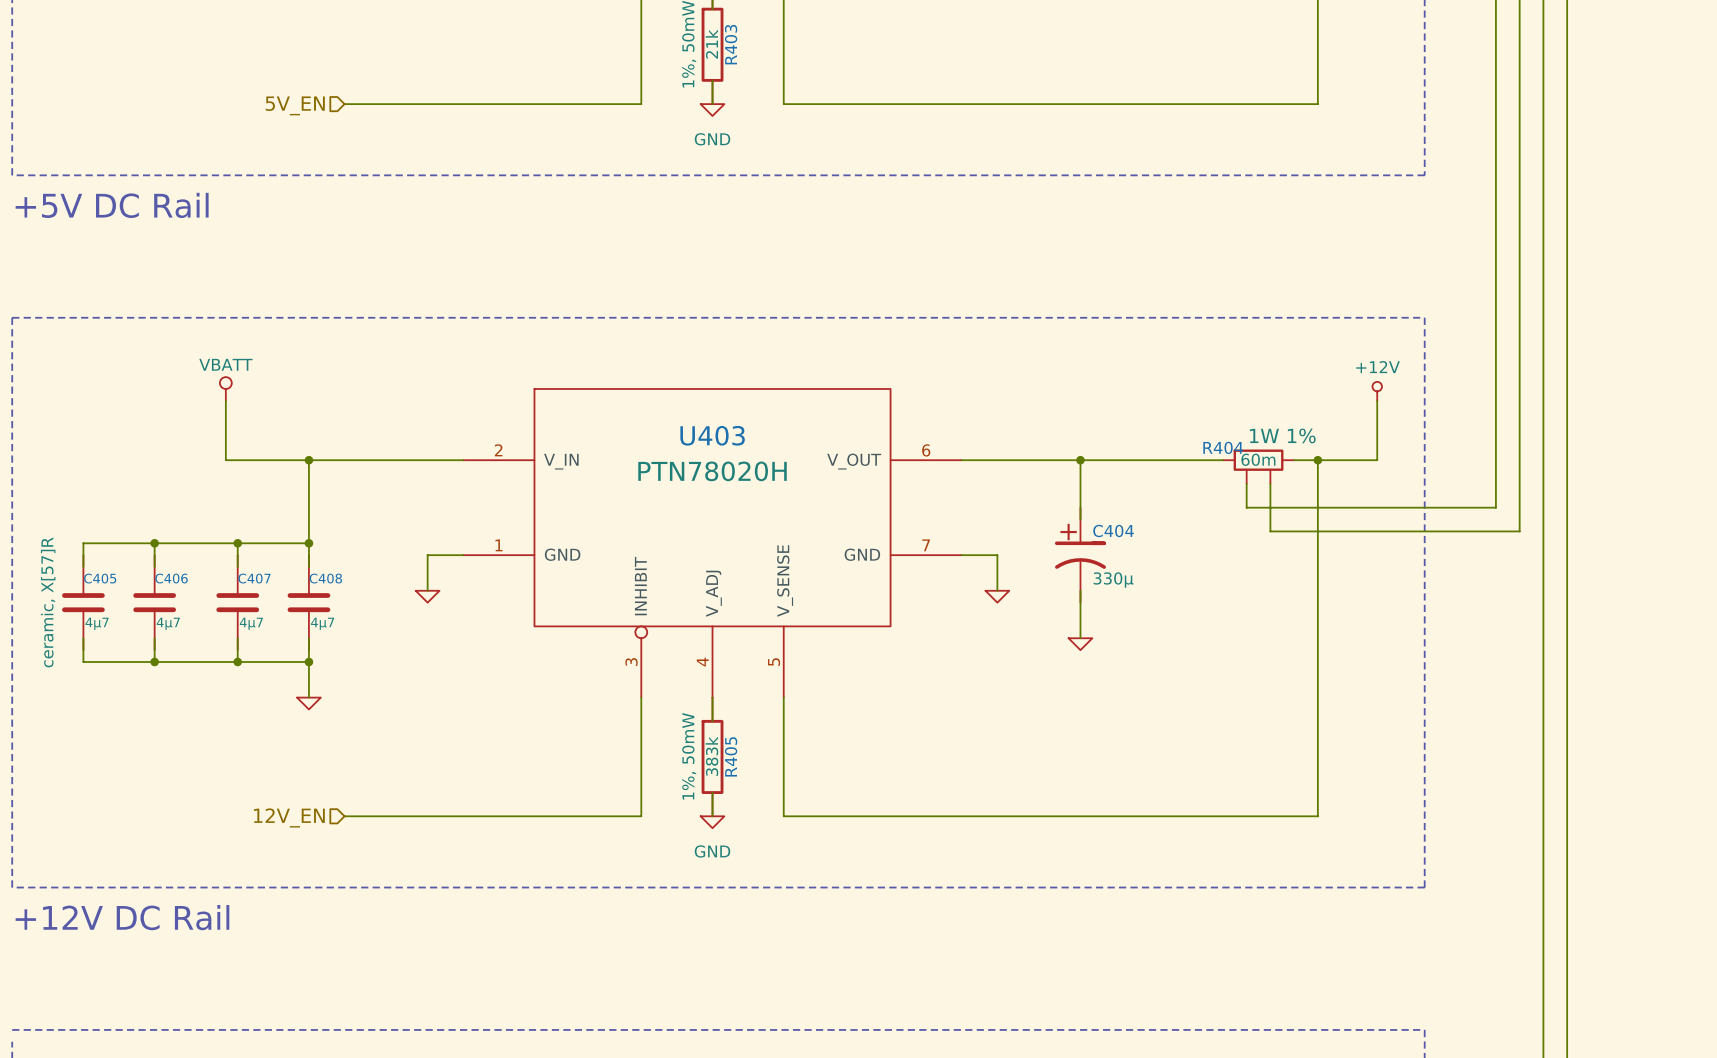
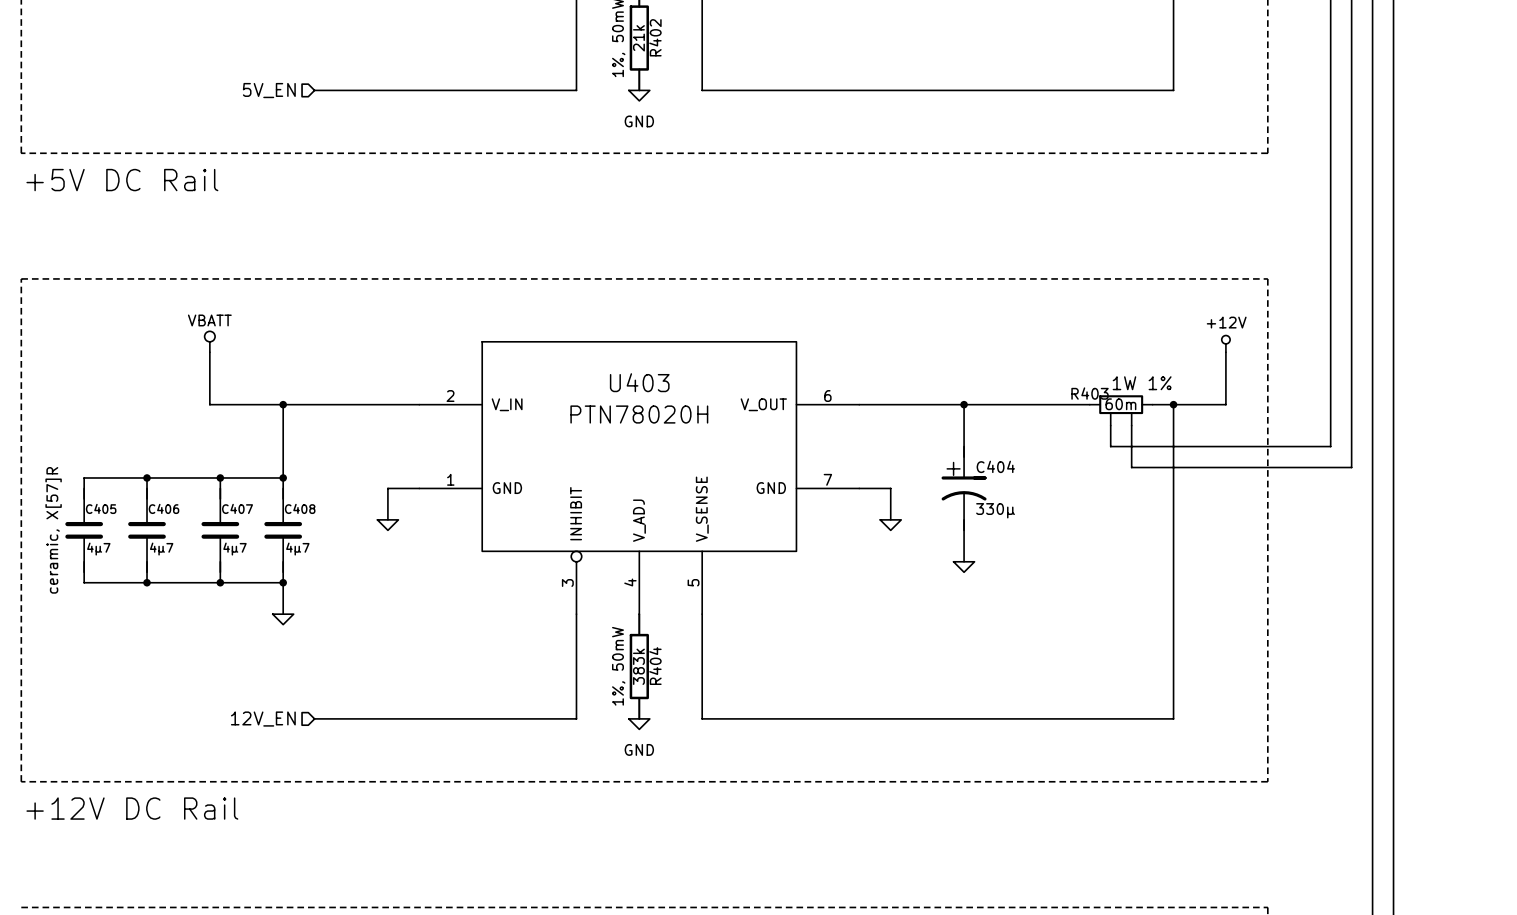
R403 name: R403 (731, 44) -> R402 (655, 37)
R404 name: R404 (1223, 447) -> R403 (1090, 393)
R405 name: R405 (731, 756) -> R404 (655, 666)

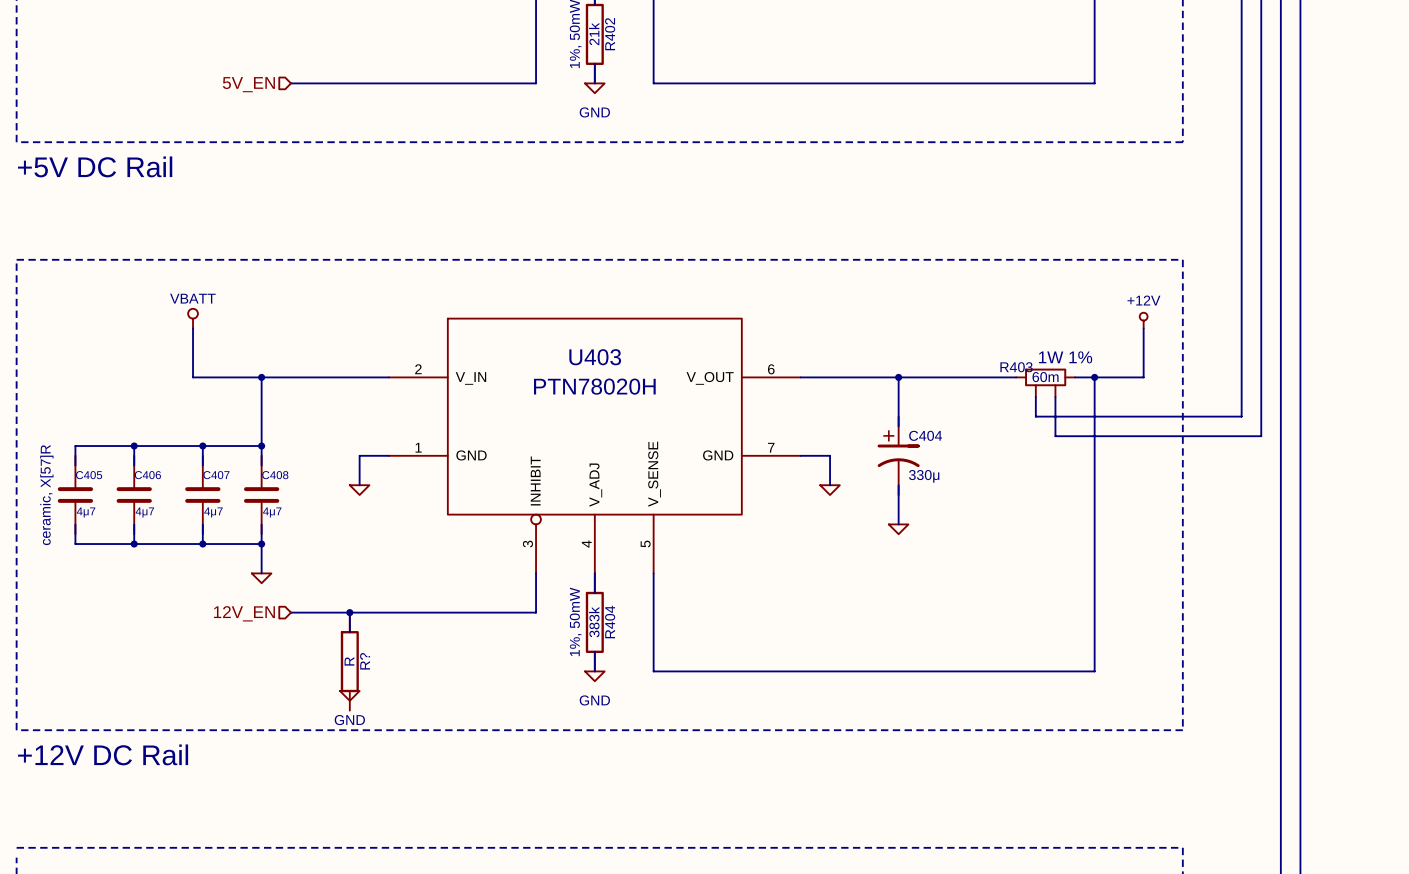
wire: none -> (349, 612) (349, 632)
junction: none -> (349, 612)
wire: (576, 656) (576, 718) (314, 718) -> (536, 612) (291, 612)
R?: none -> R (349, 661)
hierarchical label position: 12V_EN (263, 719) -> 12V_EN (244, 613)
power symbol: none -> GND (349, 695)

